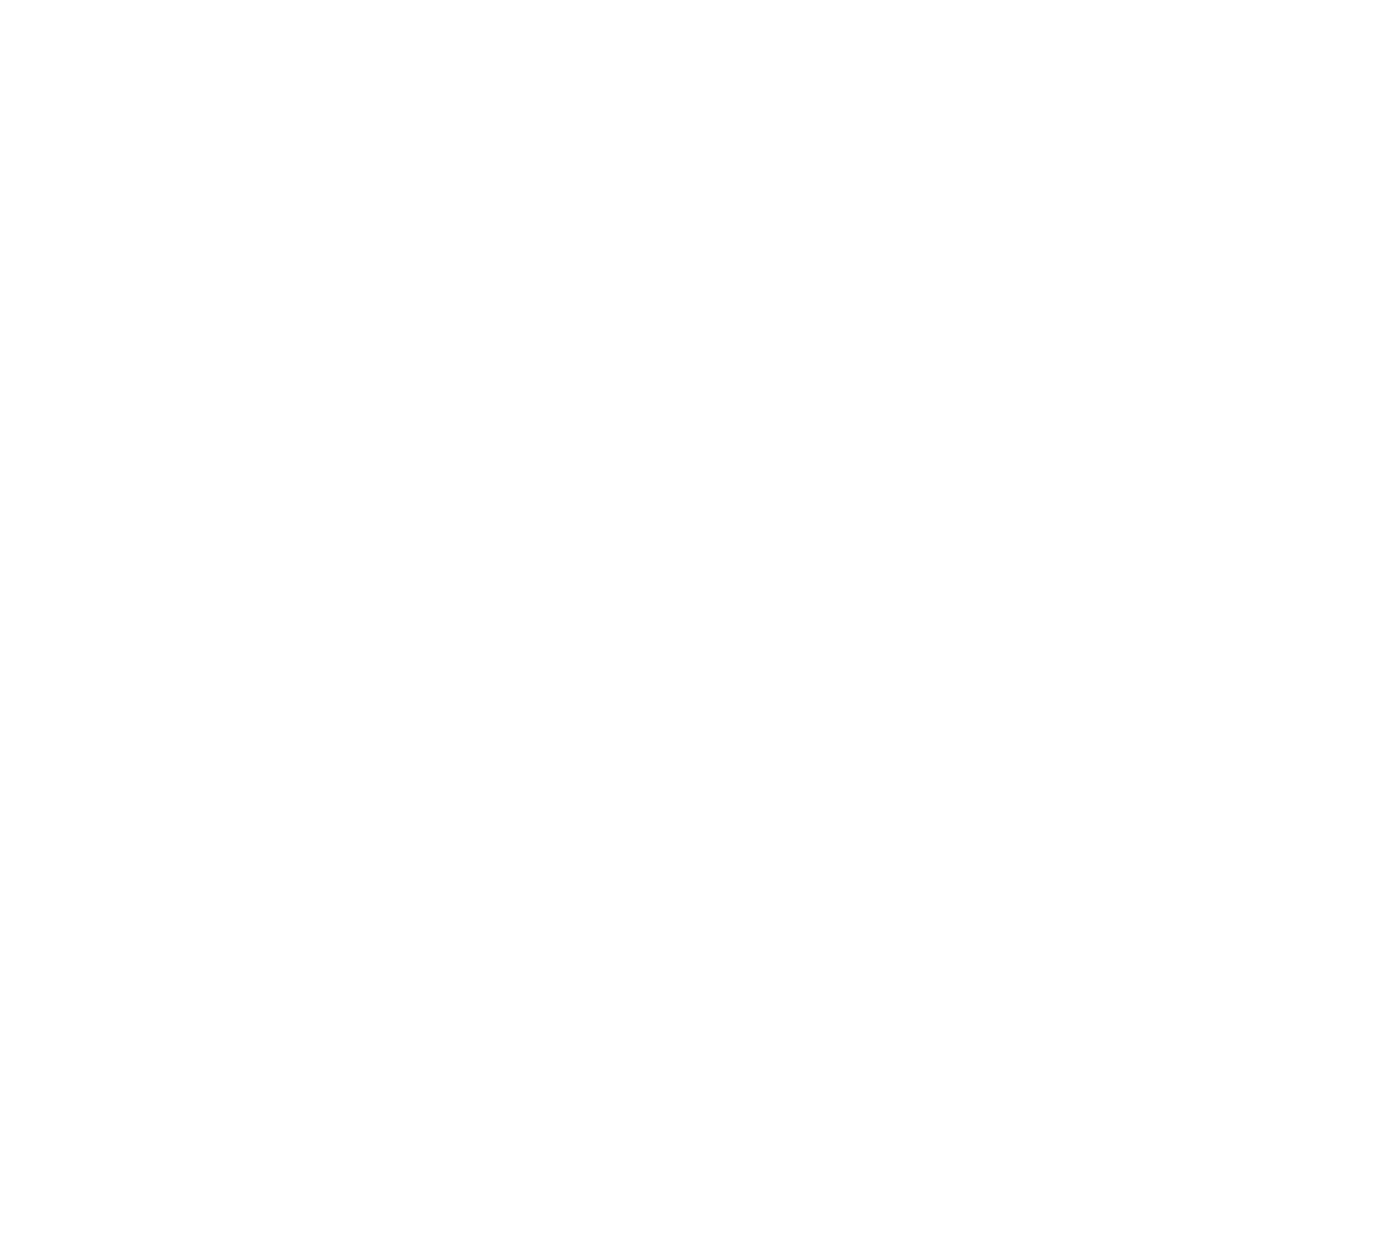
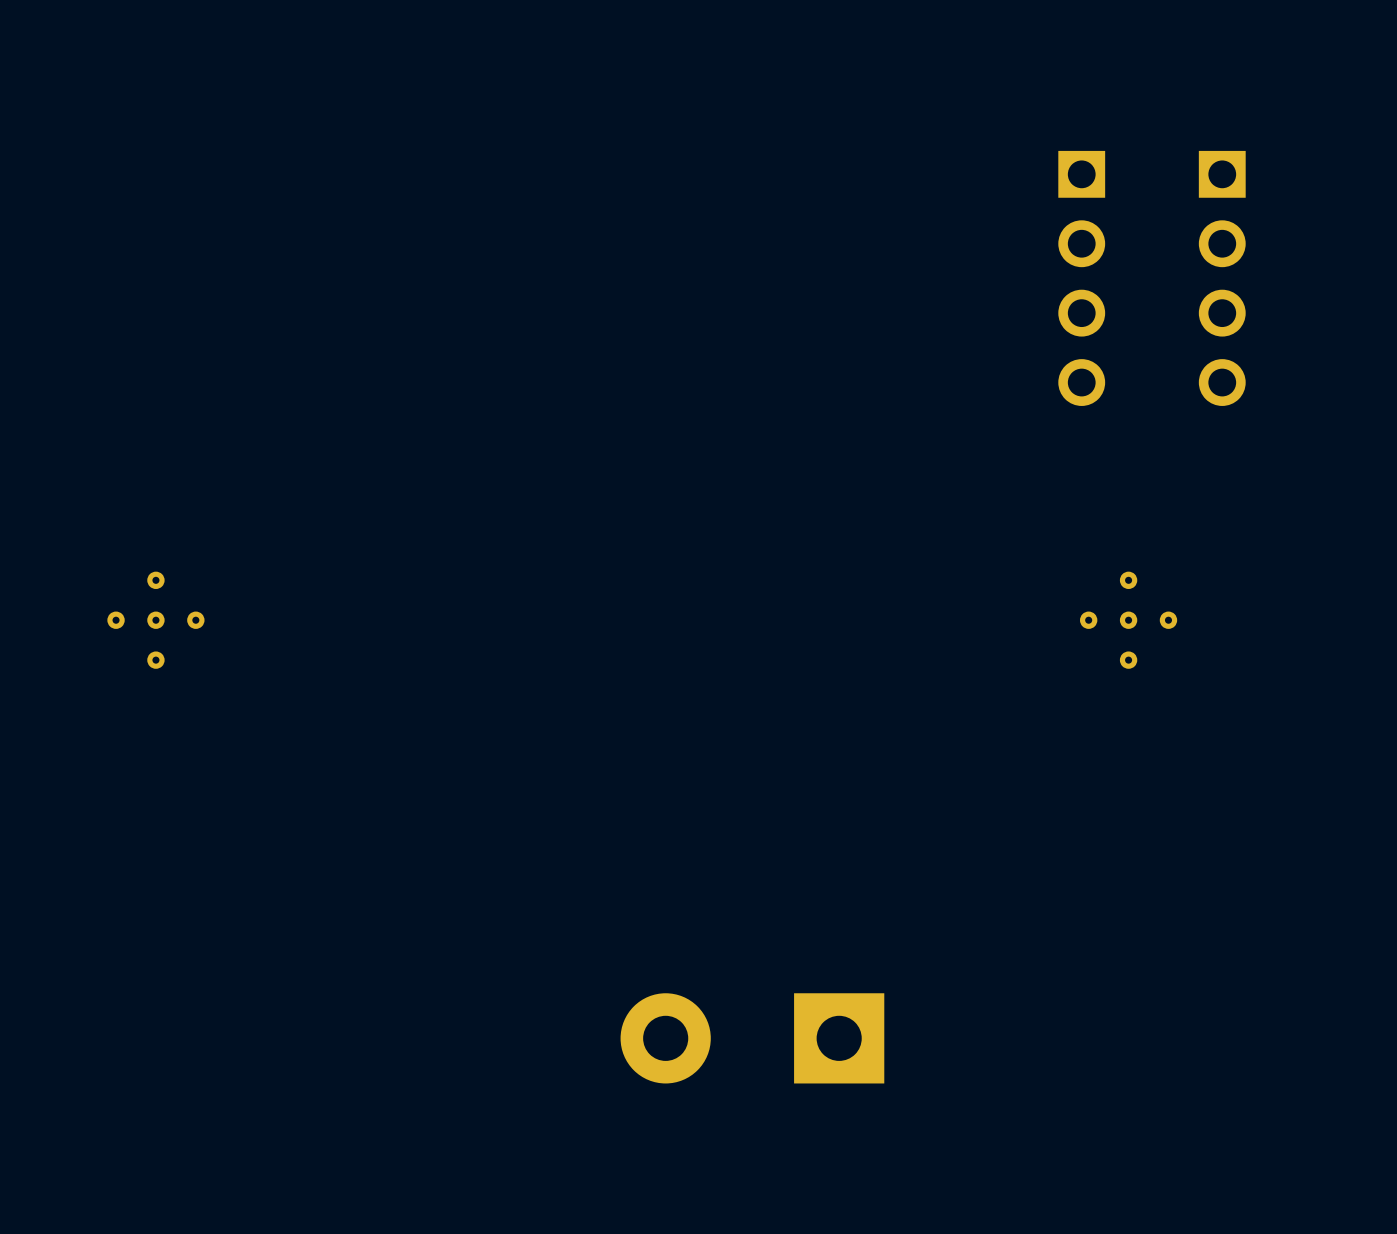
part: none -> (1081, 278)
part: none -> (1222, 278)
part: none -> (155, 620)
part: none -> (1128, 620)
part: none -> (752, 1038)

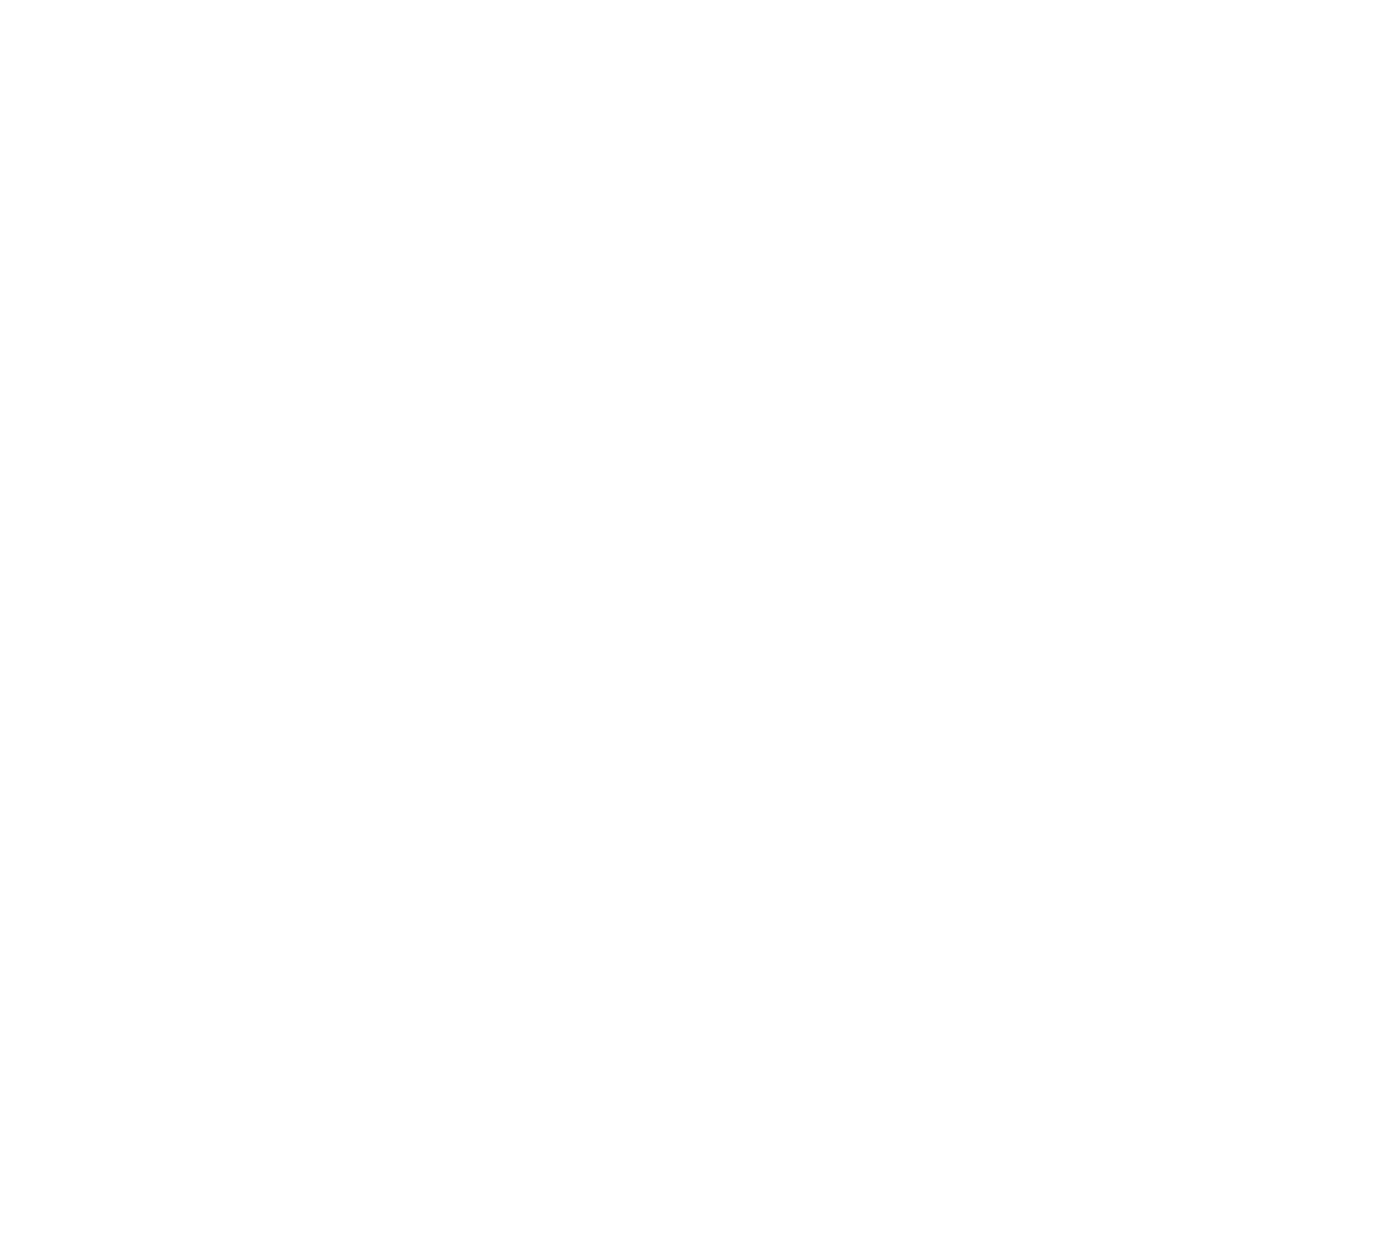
part: (1081, 278) -> none
part: (1222, 278) -> none
part: (155, 620) -> none
part: (1128, 620) -> none
part: (752, 1038) -> none

